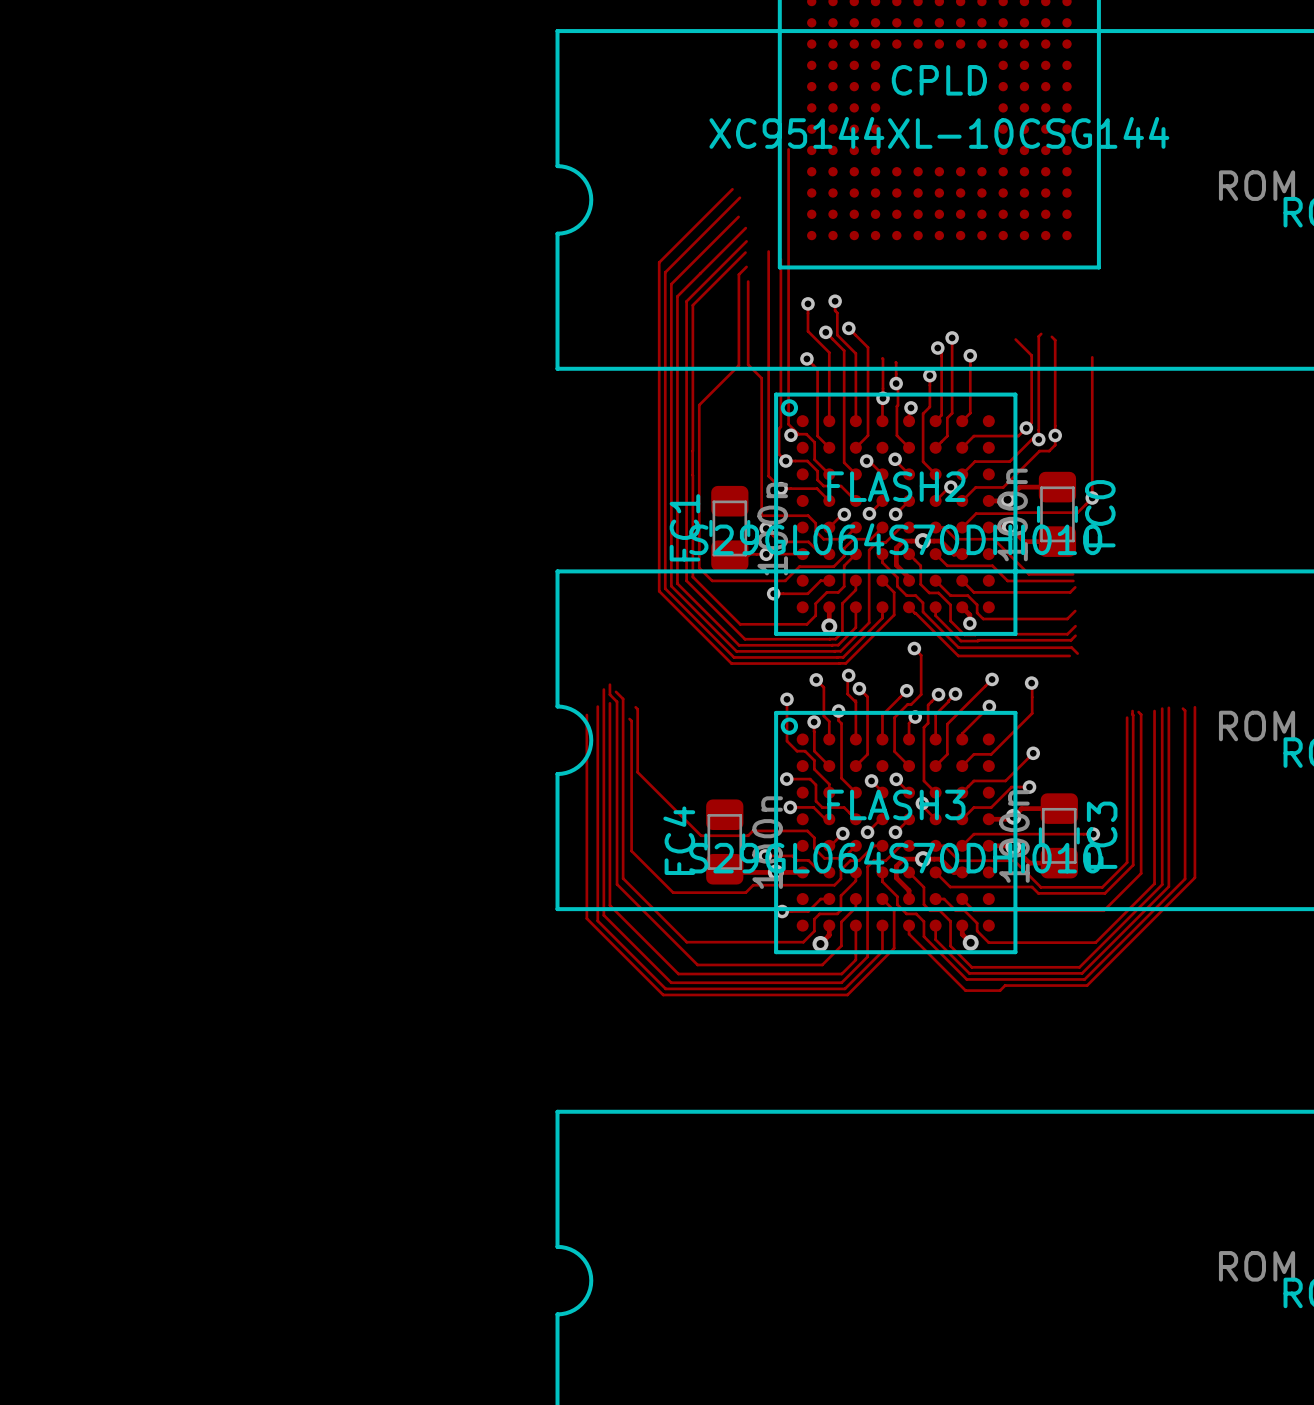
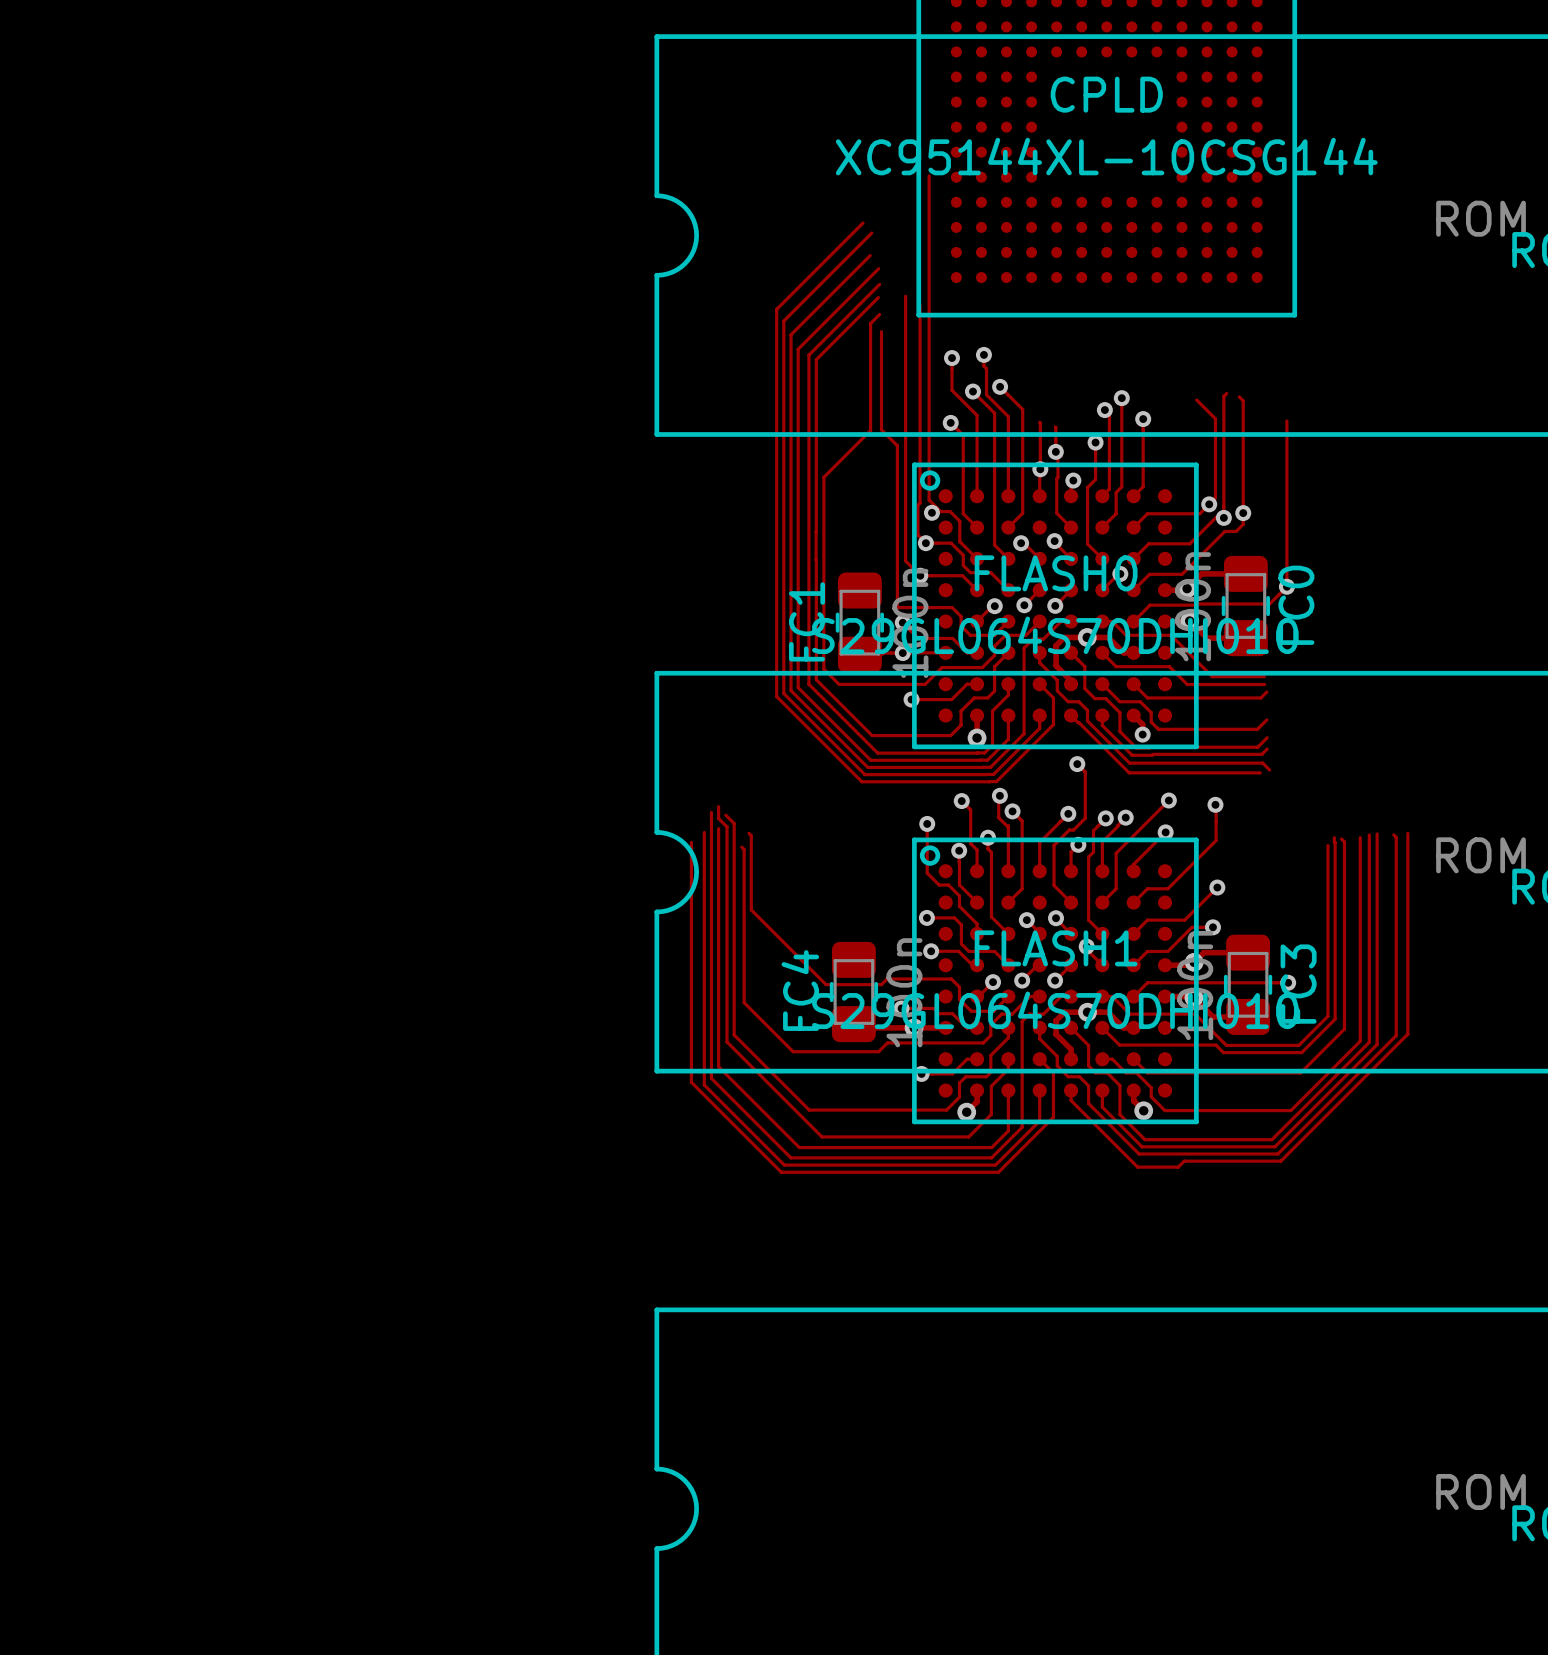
FLASH2 name: FLASH2 (896, 486) -> FLASH0 (1056, 573)
FLASH3 name: FLASH3 (896, 804) -> FLASH1 (1056, 948)

